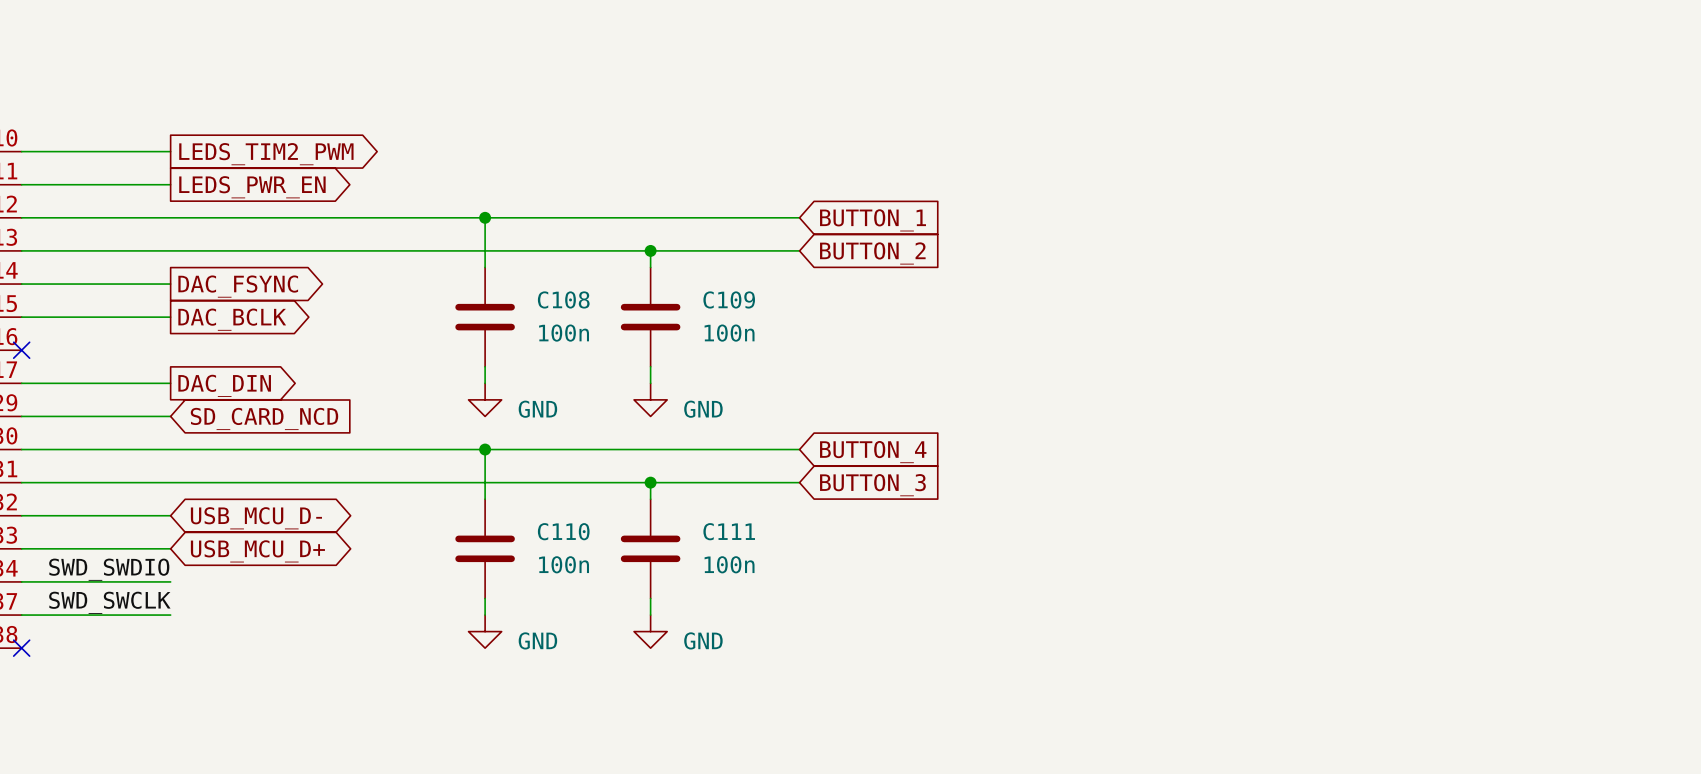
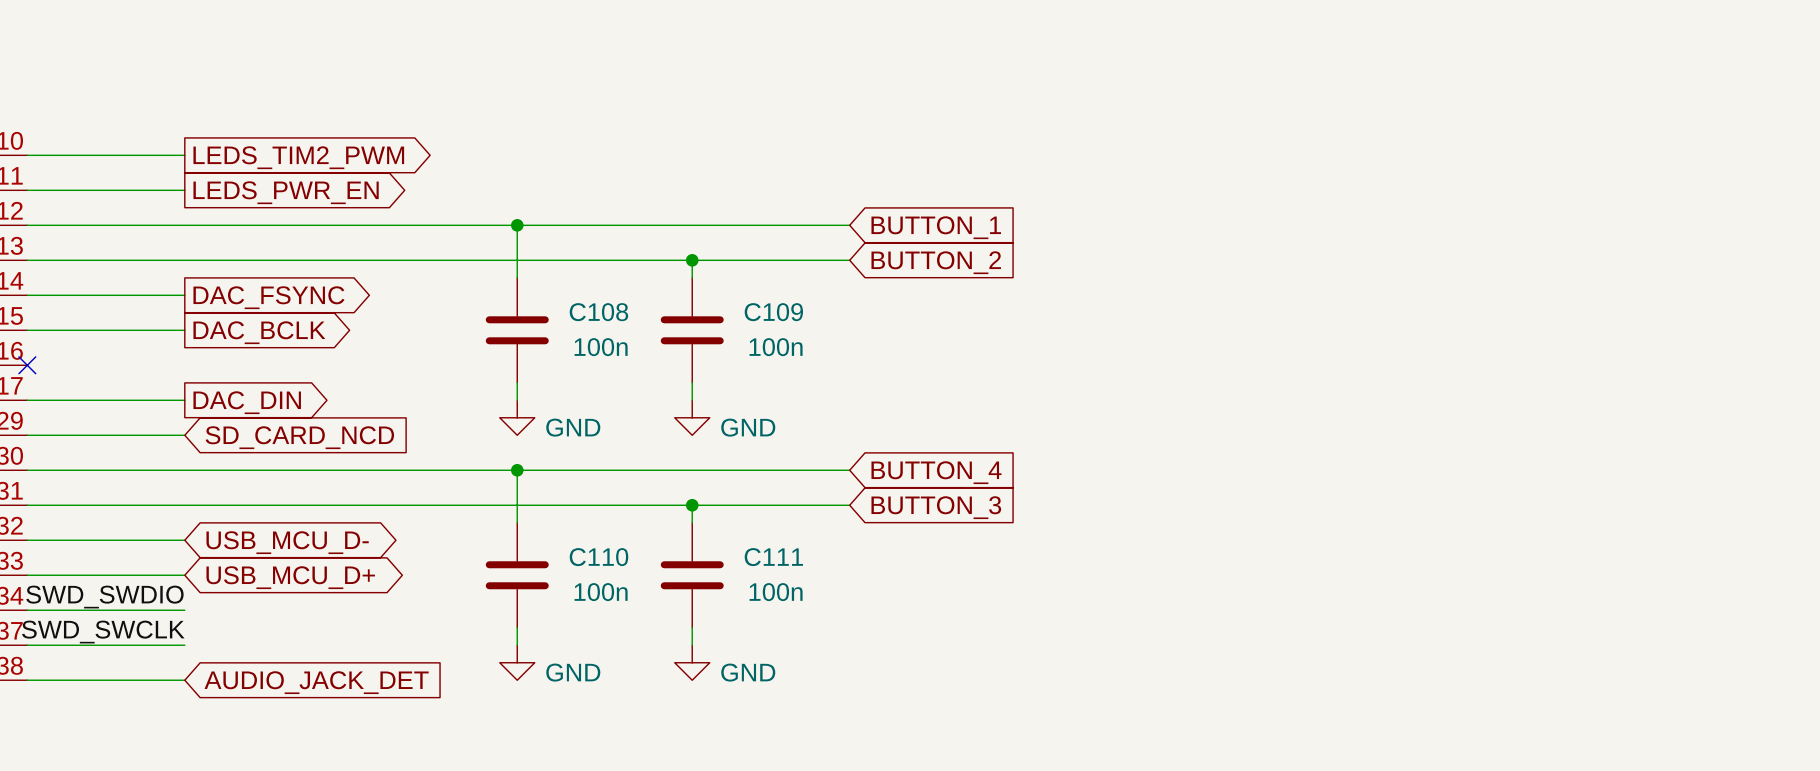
wire: none -> (27, 680) (184, 680)
no-connect mark: (21, 648) -> none
global label: none -> AUDIO_JACK_DET (316, 682)

